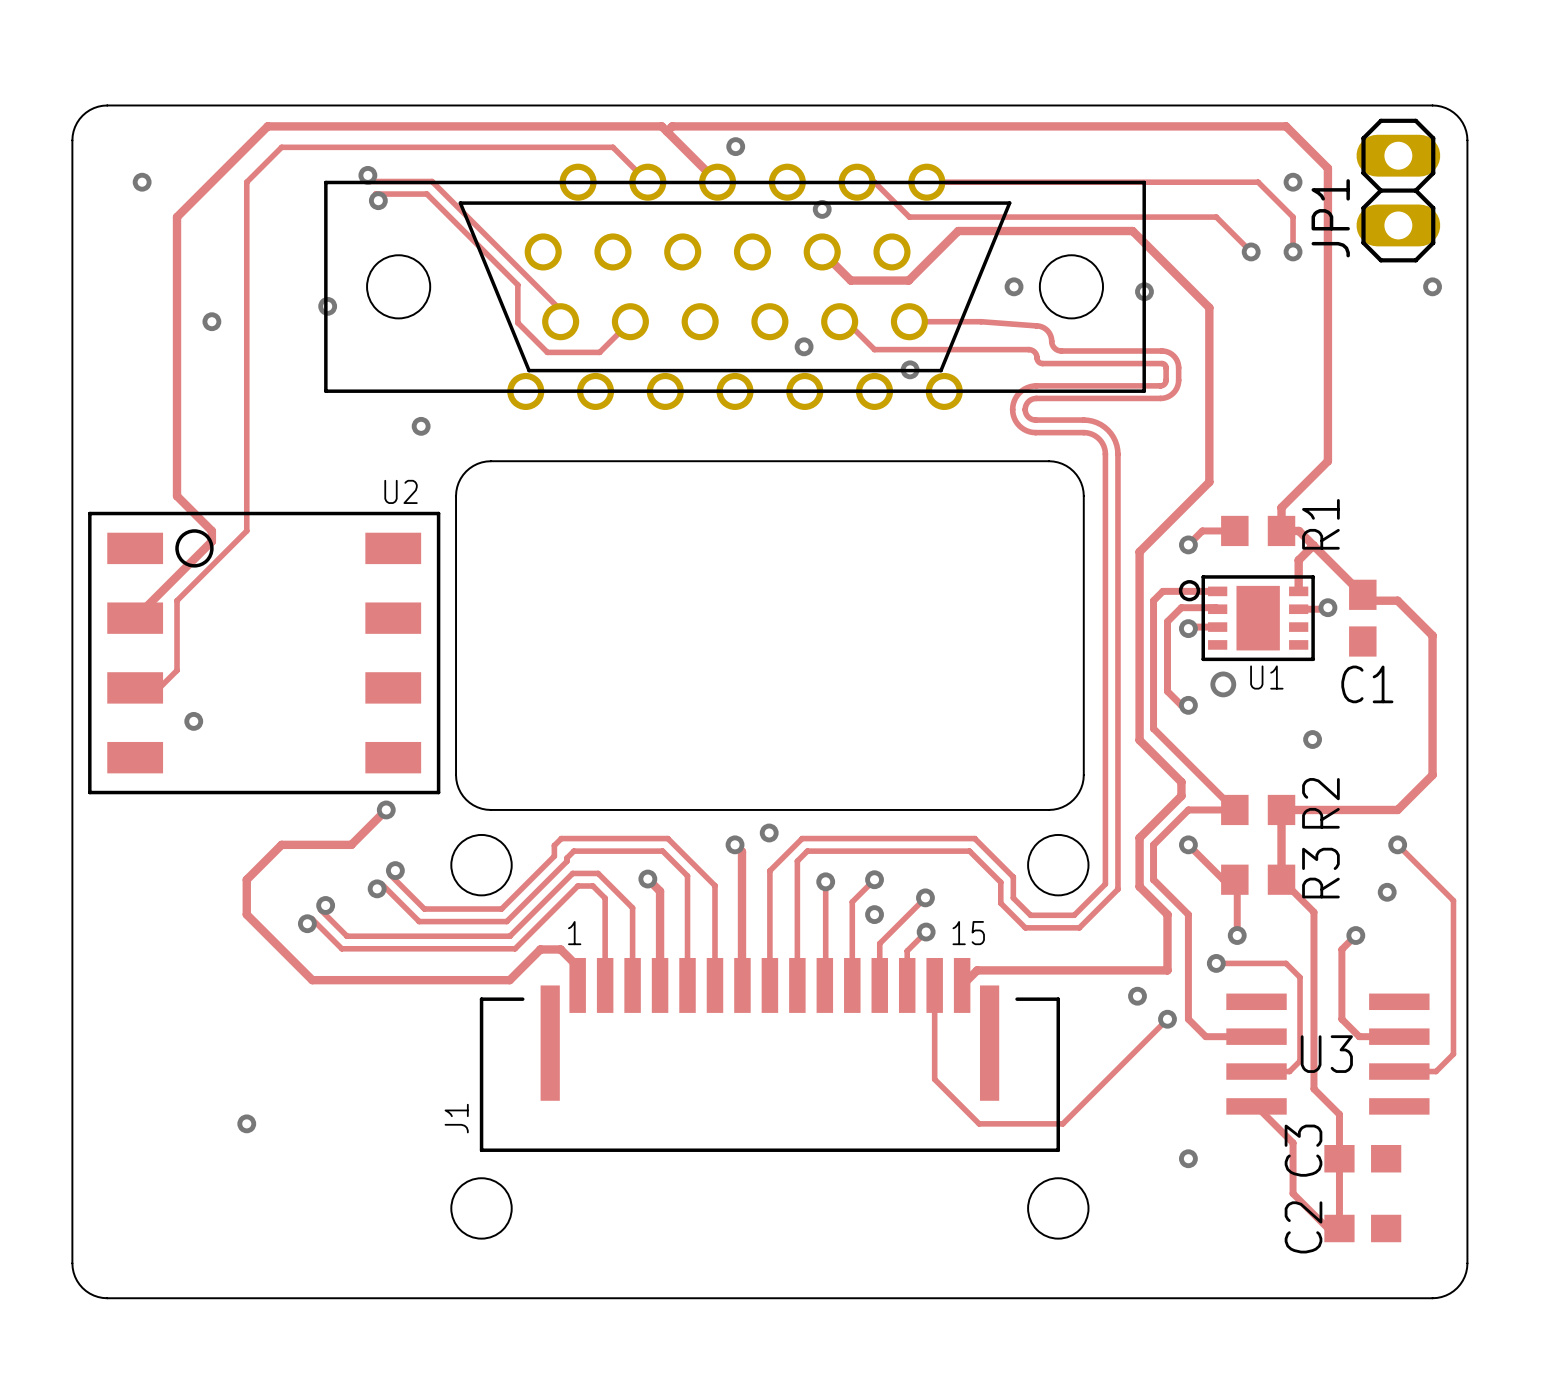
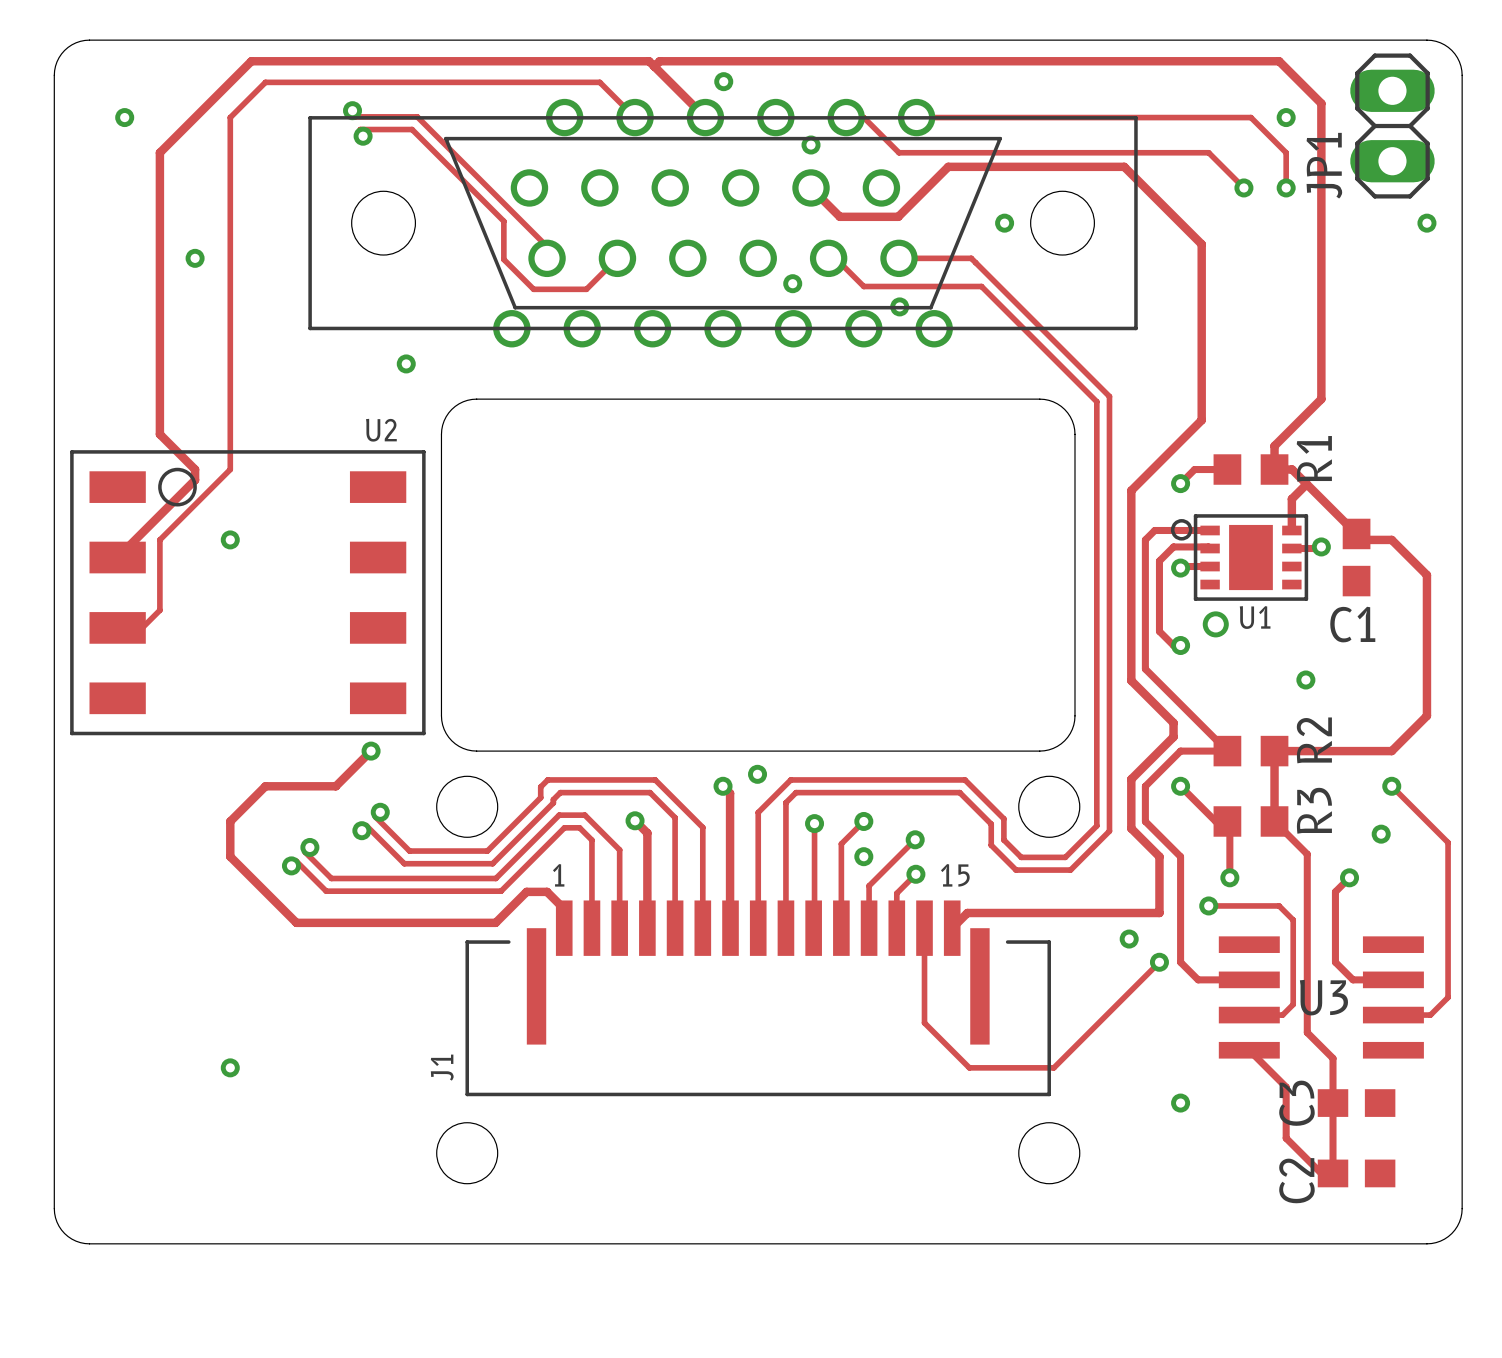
via: (1144, 291) -> none
via: (327, 306) -> none
track: (981, 321) (1042, 327) (1049, 333) (1053, 347) (1060, 350) (1161, 351) (1173, 355) (1178, 365) (1178, 384) (1173, 393) (1165, 397) (1036, 398) (1026, 404) (1025, 413) (1032, 419) (1088, 420) (1100, 424) (1113, 437) (1116, 445) (1117, 458) -> (971, 258) (1109, 396)
track: (991, 349) (1030, 349) (1035, 352) (1037, 360) (1041, 363) (1164, 364) (1166, 381) (1161, 385) (1033, 386) (1021, 390) (1015, 397) (1012, 412) (1015, 421) (1021, 427) (1032, 432) (1092, 434) (1099, 438) (1103, 445) (1105, 463) -> (981, 286) (1096, 401)
via position: (193, 721) -> (230, 539)

